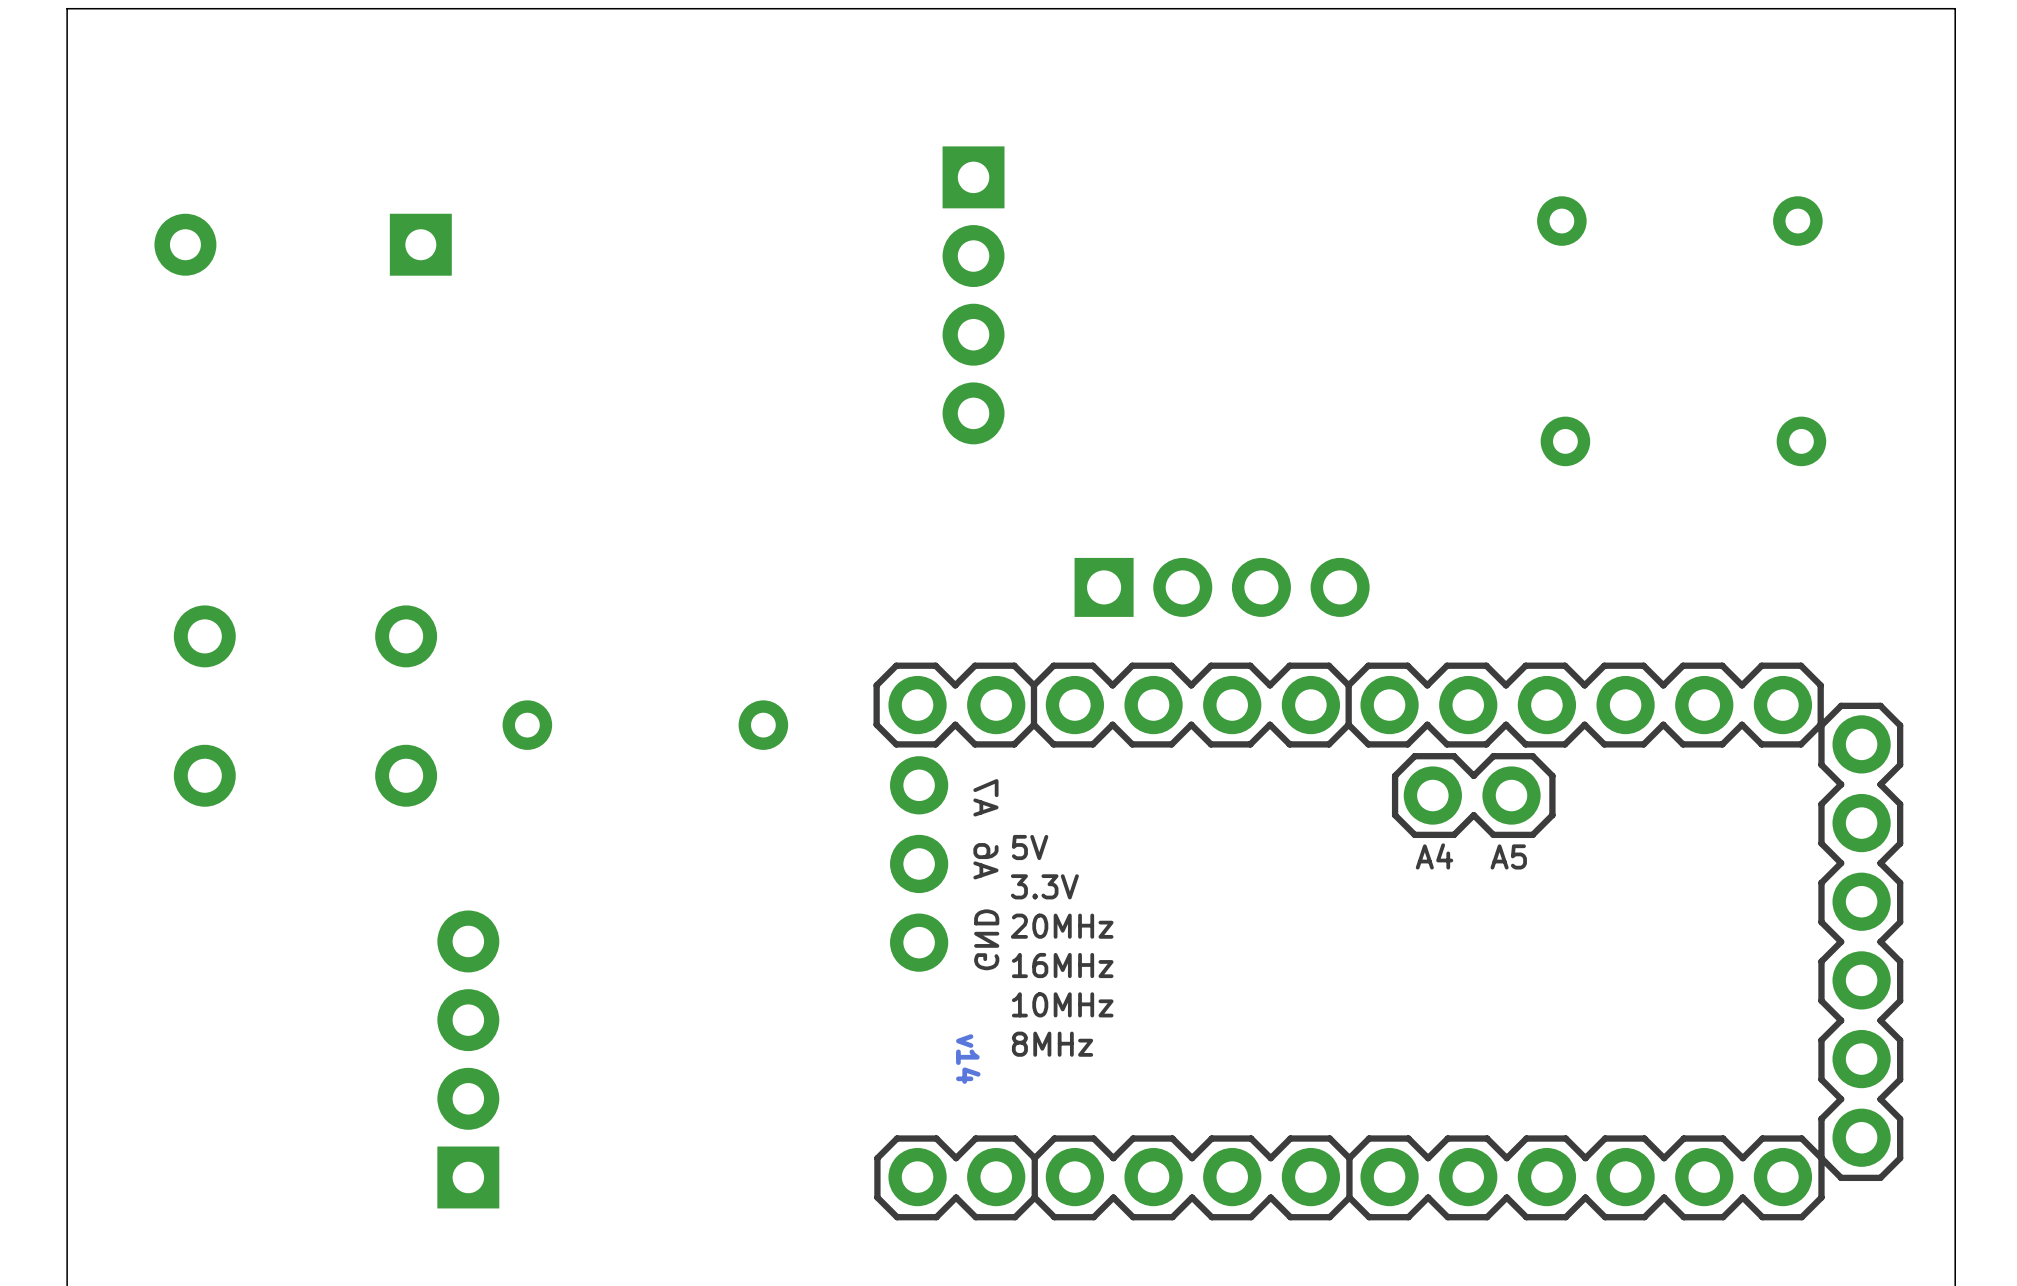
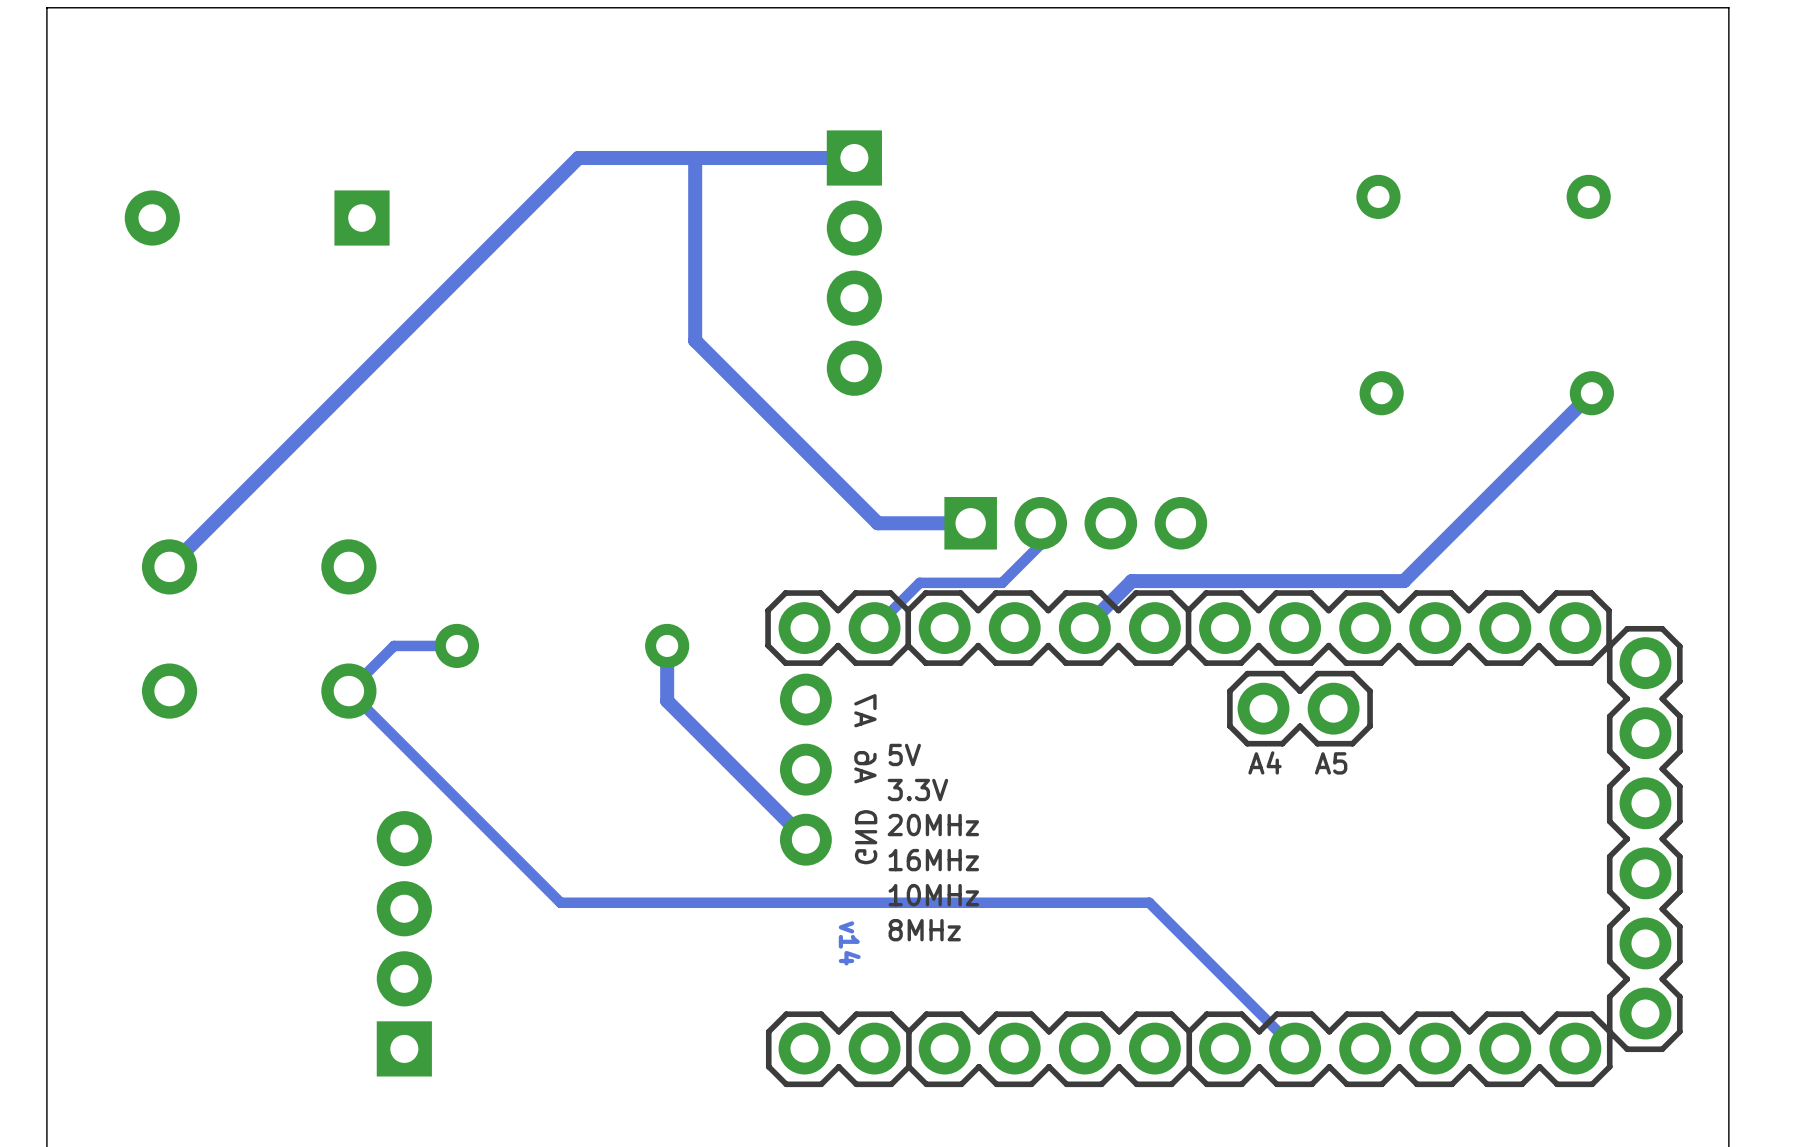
track: none -> (695, 158) (695, 340) (877, 523) (970, 523)
track: none -> (854, 158) (578, 158) (169, 566)
track: none -> (1591, 393) (1403, 581) (1131, 581) (1084, 628)
track: none -> (1040, 523) (1040, 544) (1002, 582) (919, 582) (874, 628)
track: none -> (456, 645) (394, 645) (348, 691) (560, 902) (1149, 902) (1295, 1048)
track: none -> (667, 645) (667, 700) (805, 839)

